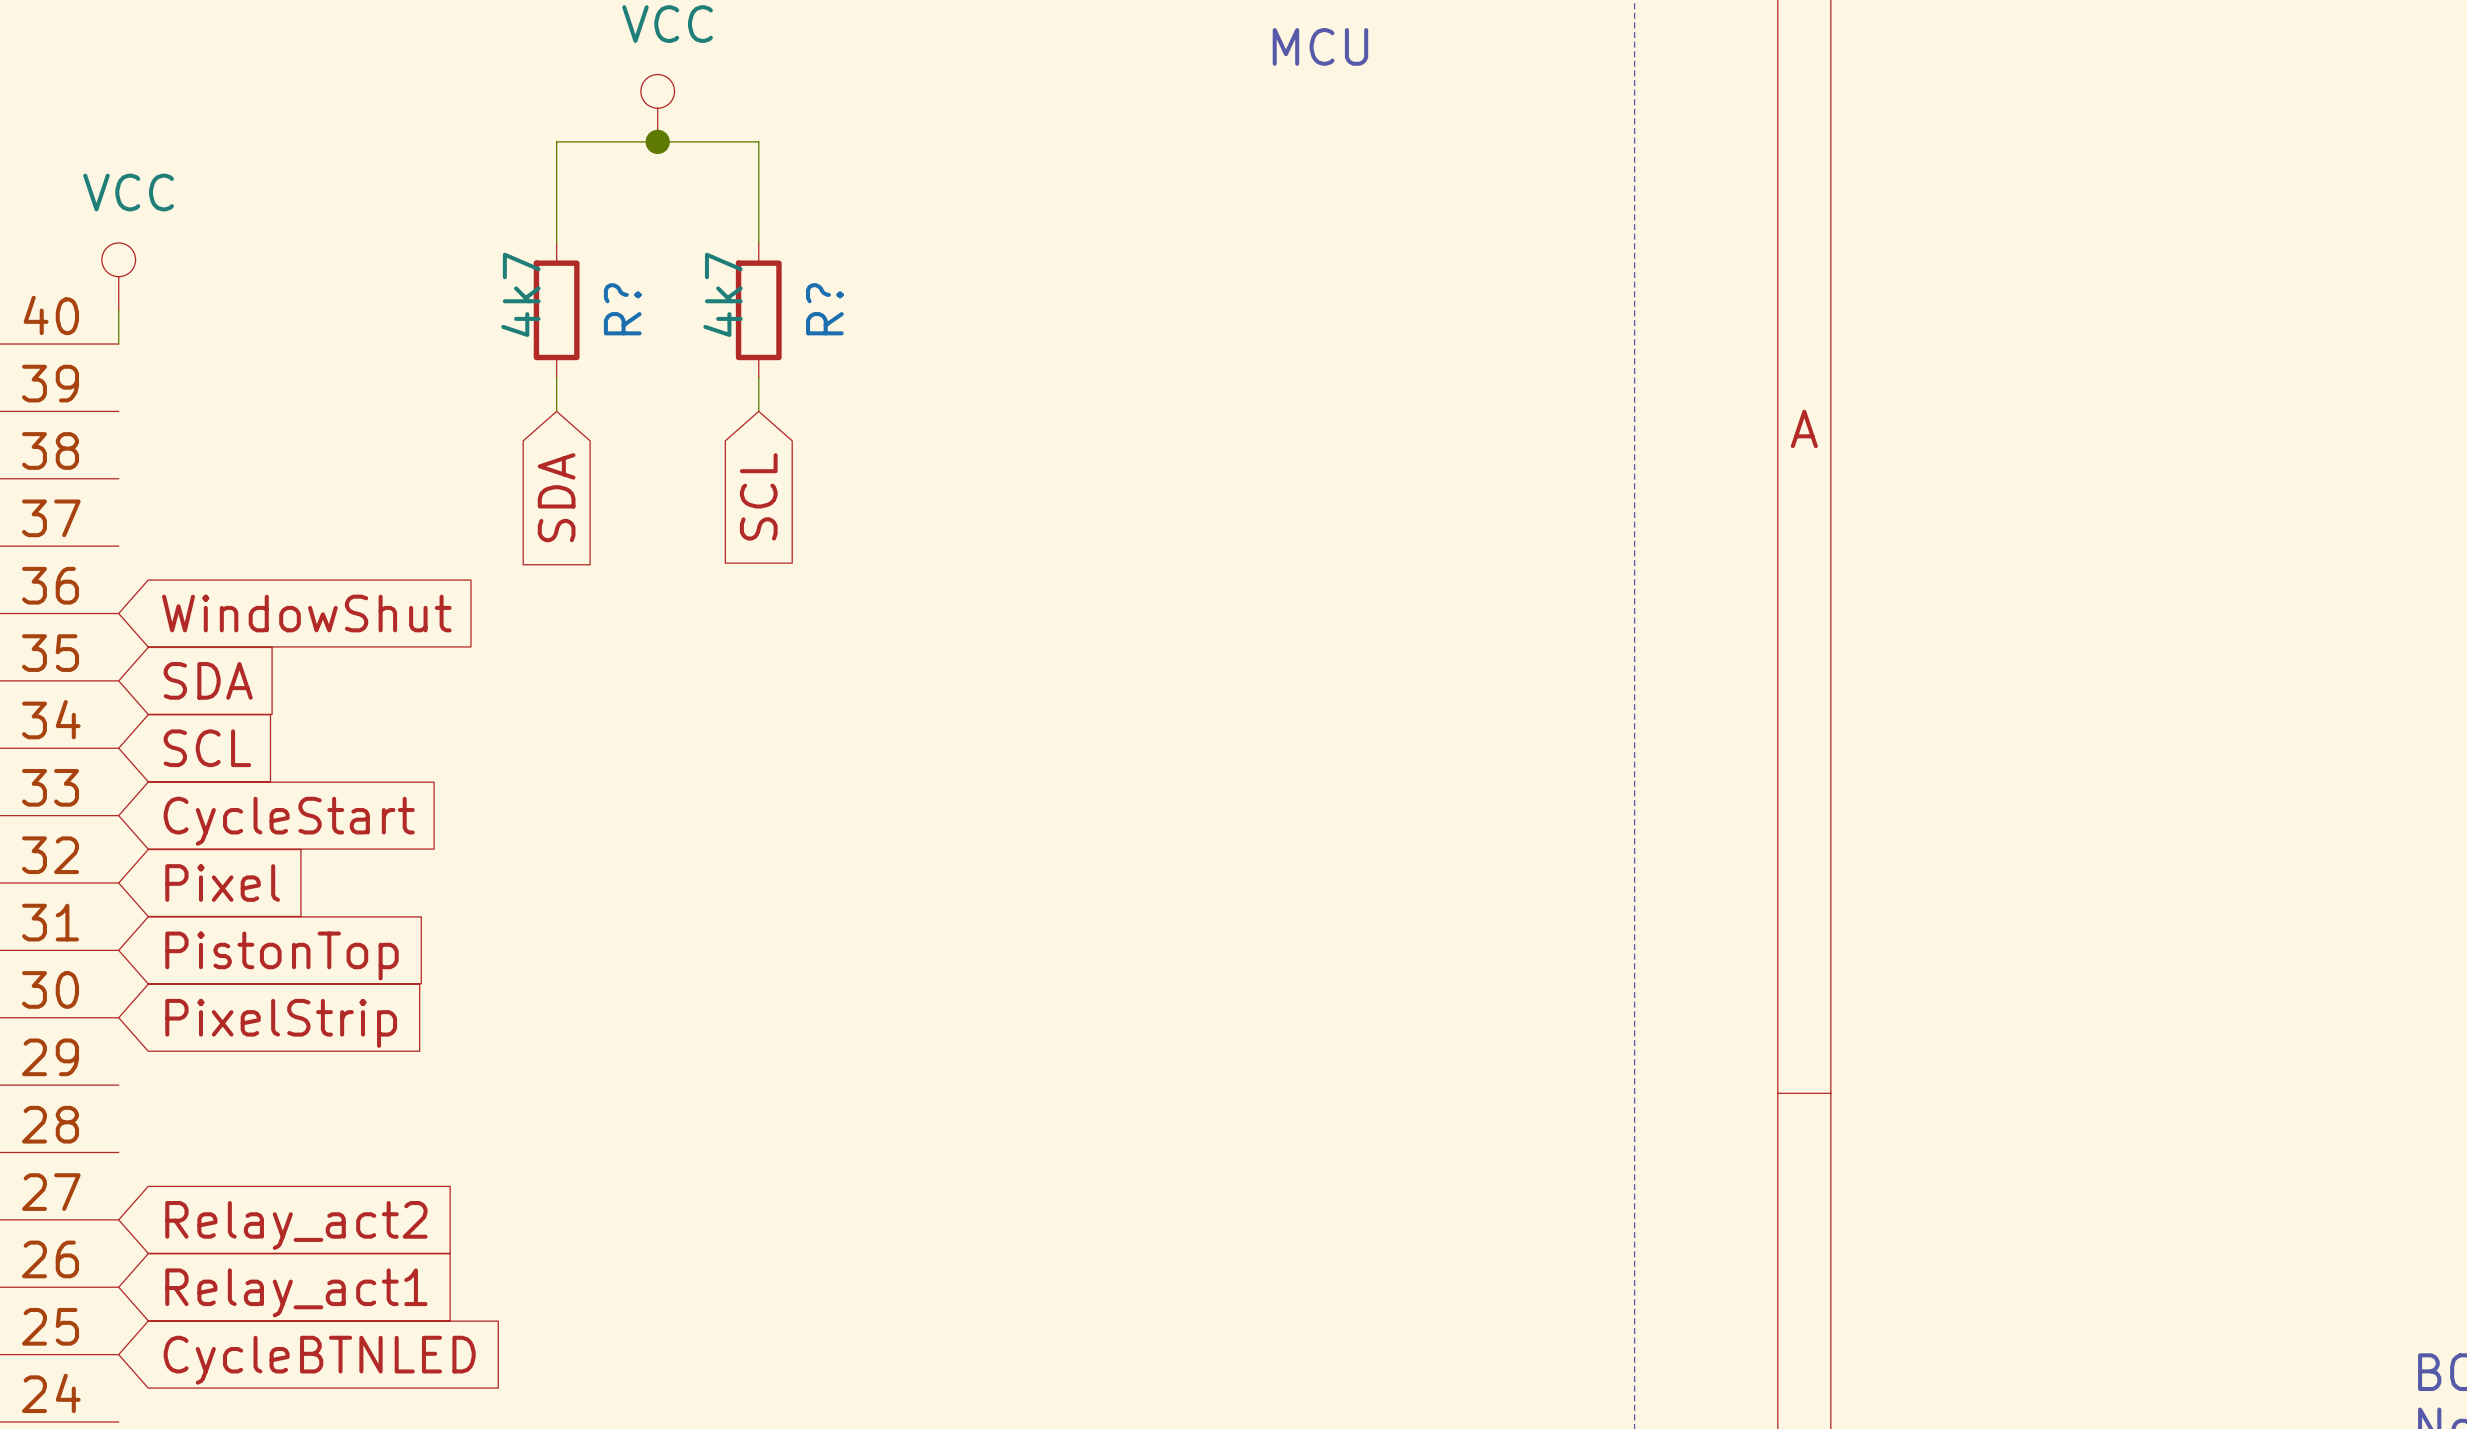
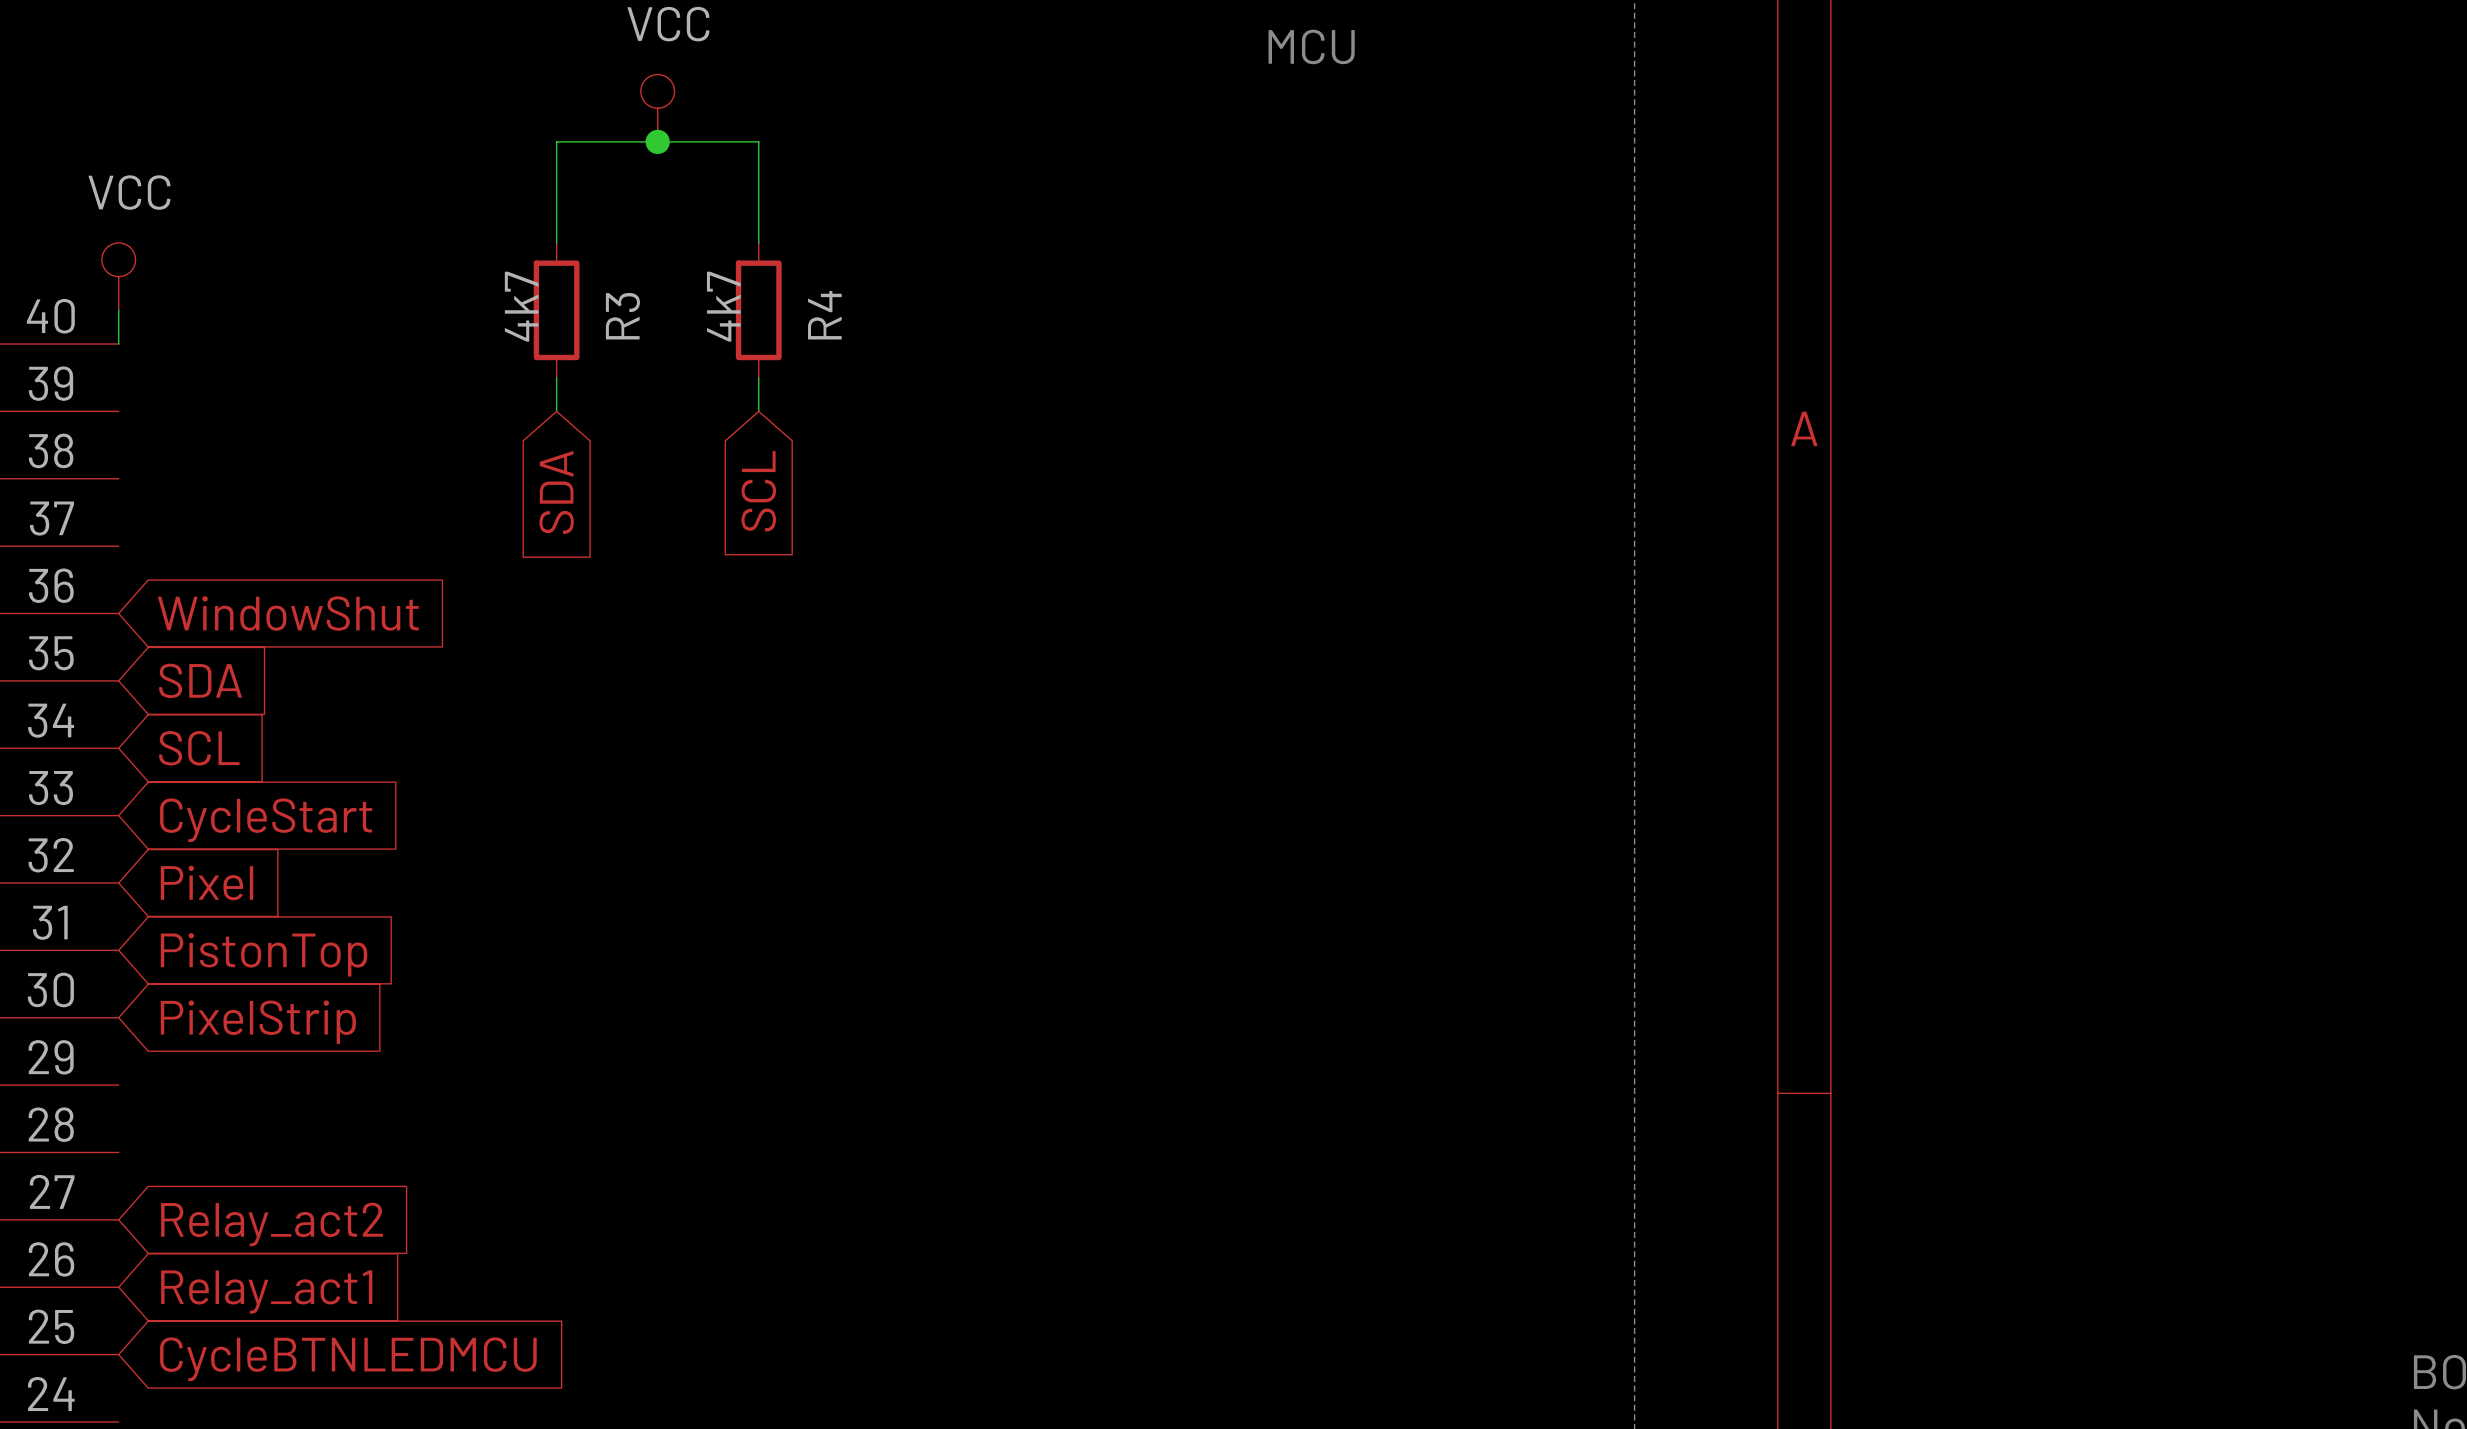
R? name: R? (622, 309) -> R3 (622, 316)
R? name: R? (824, 309) -> R4 (824, 315)
global label: CycleBTNLED (319, 1360) -> CycleBTNLEDMCU (348, 1359)

